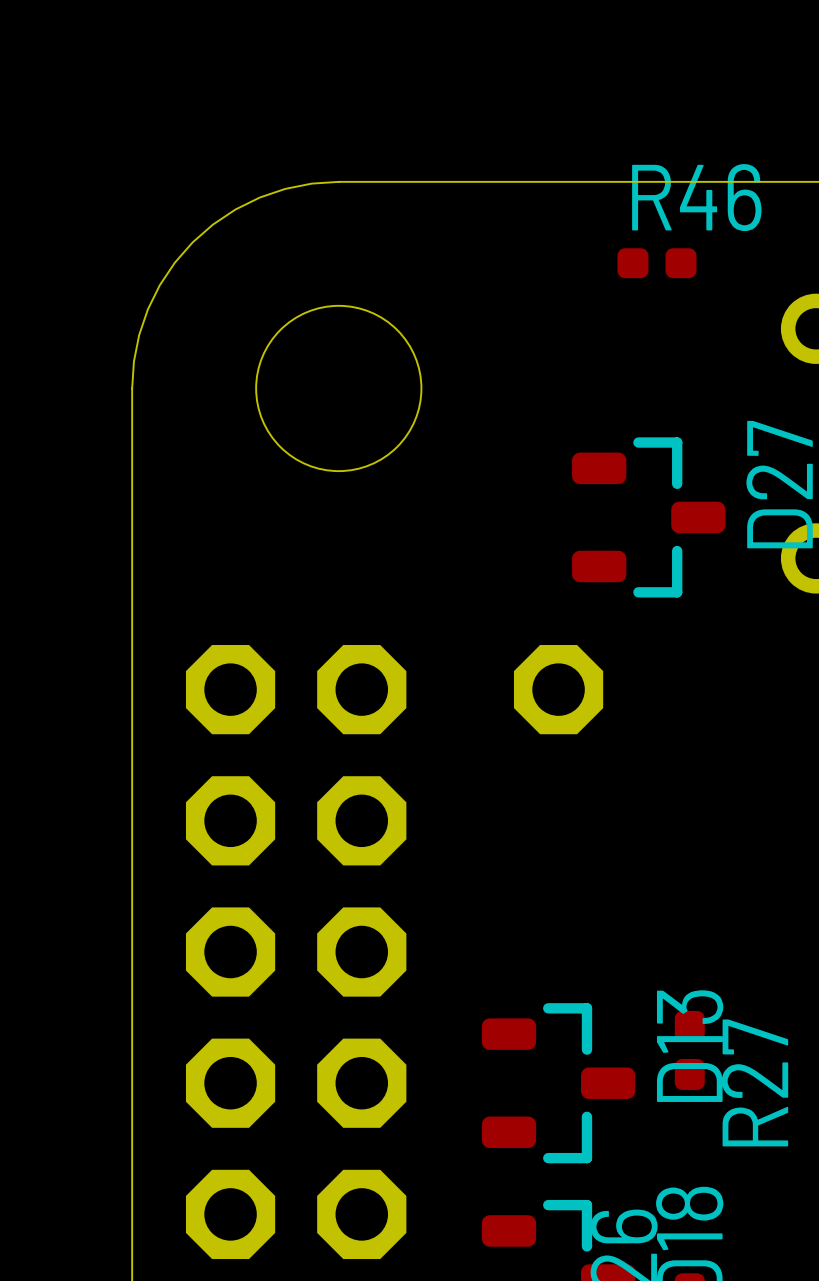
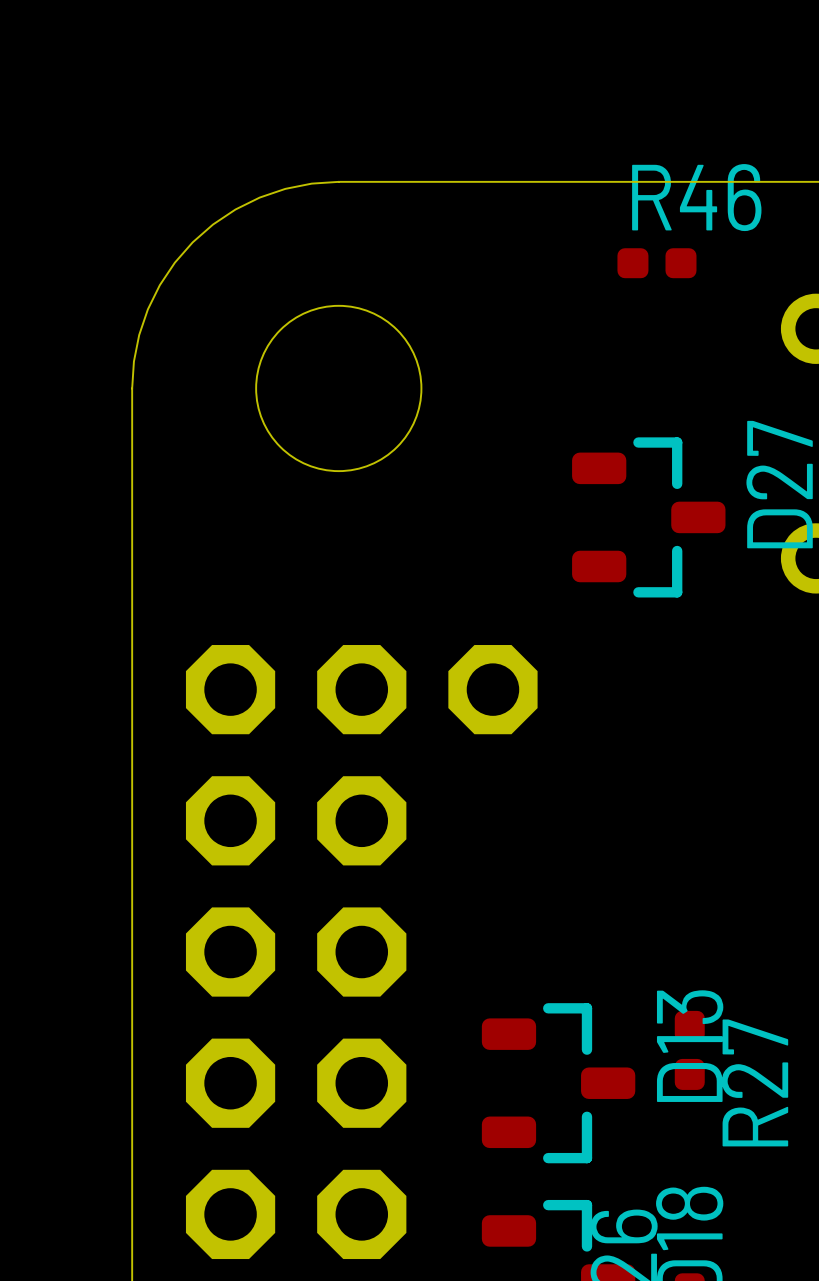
part position: (558, 689) -> (492, 689)

